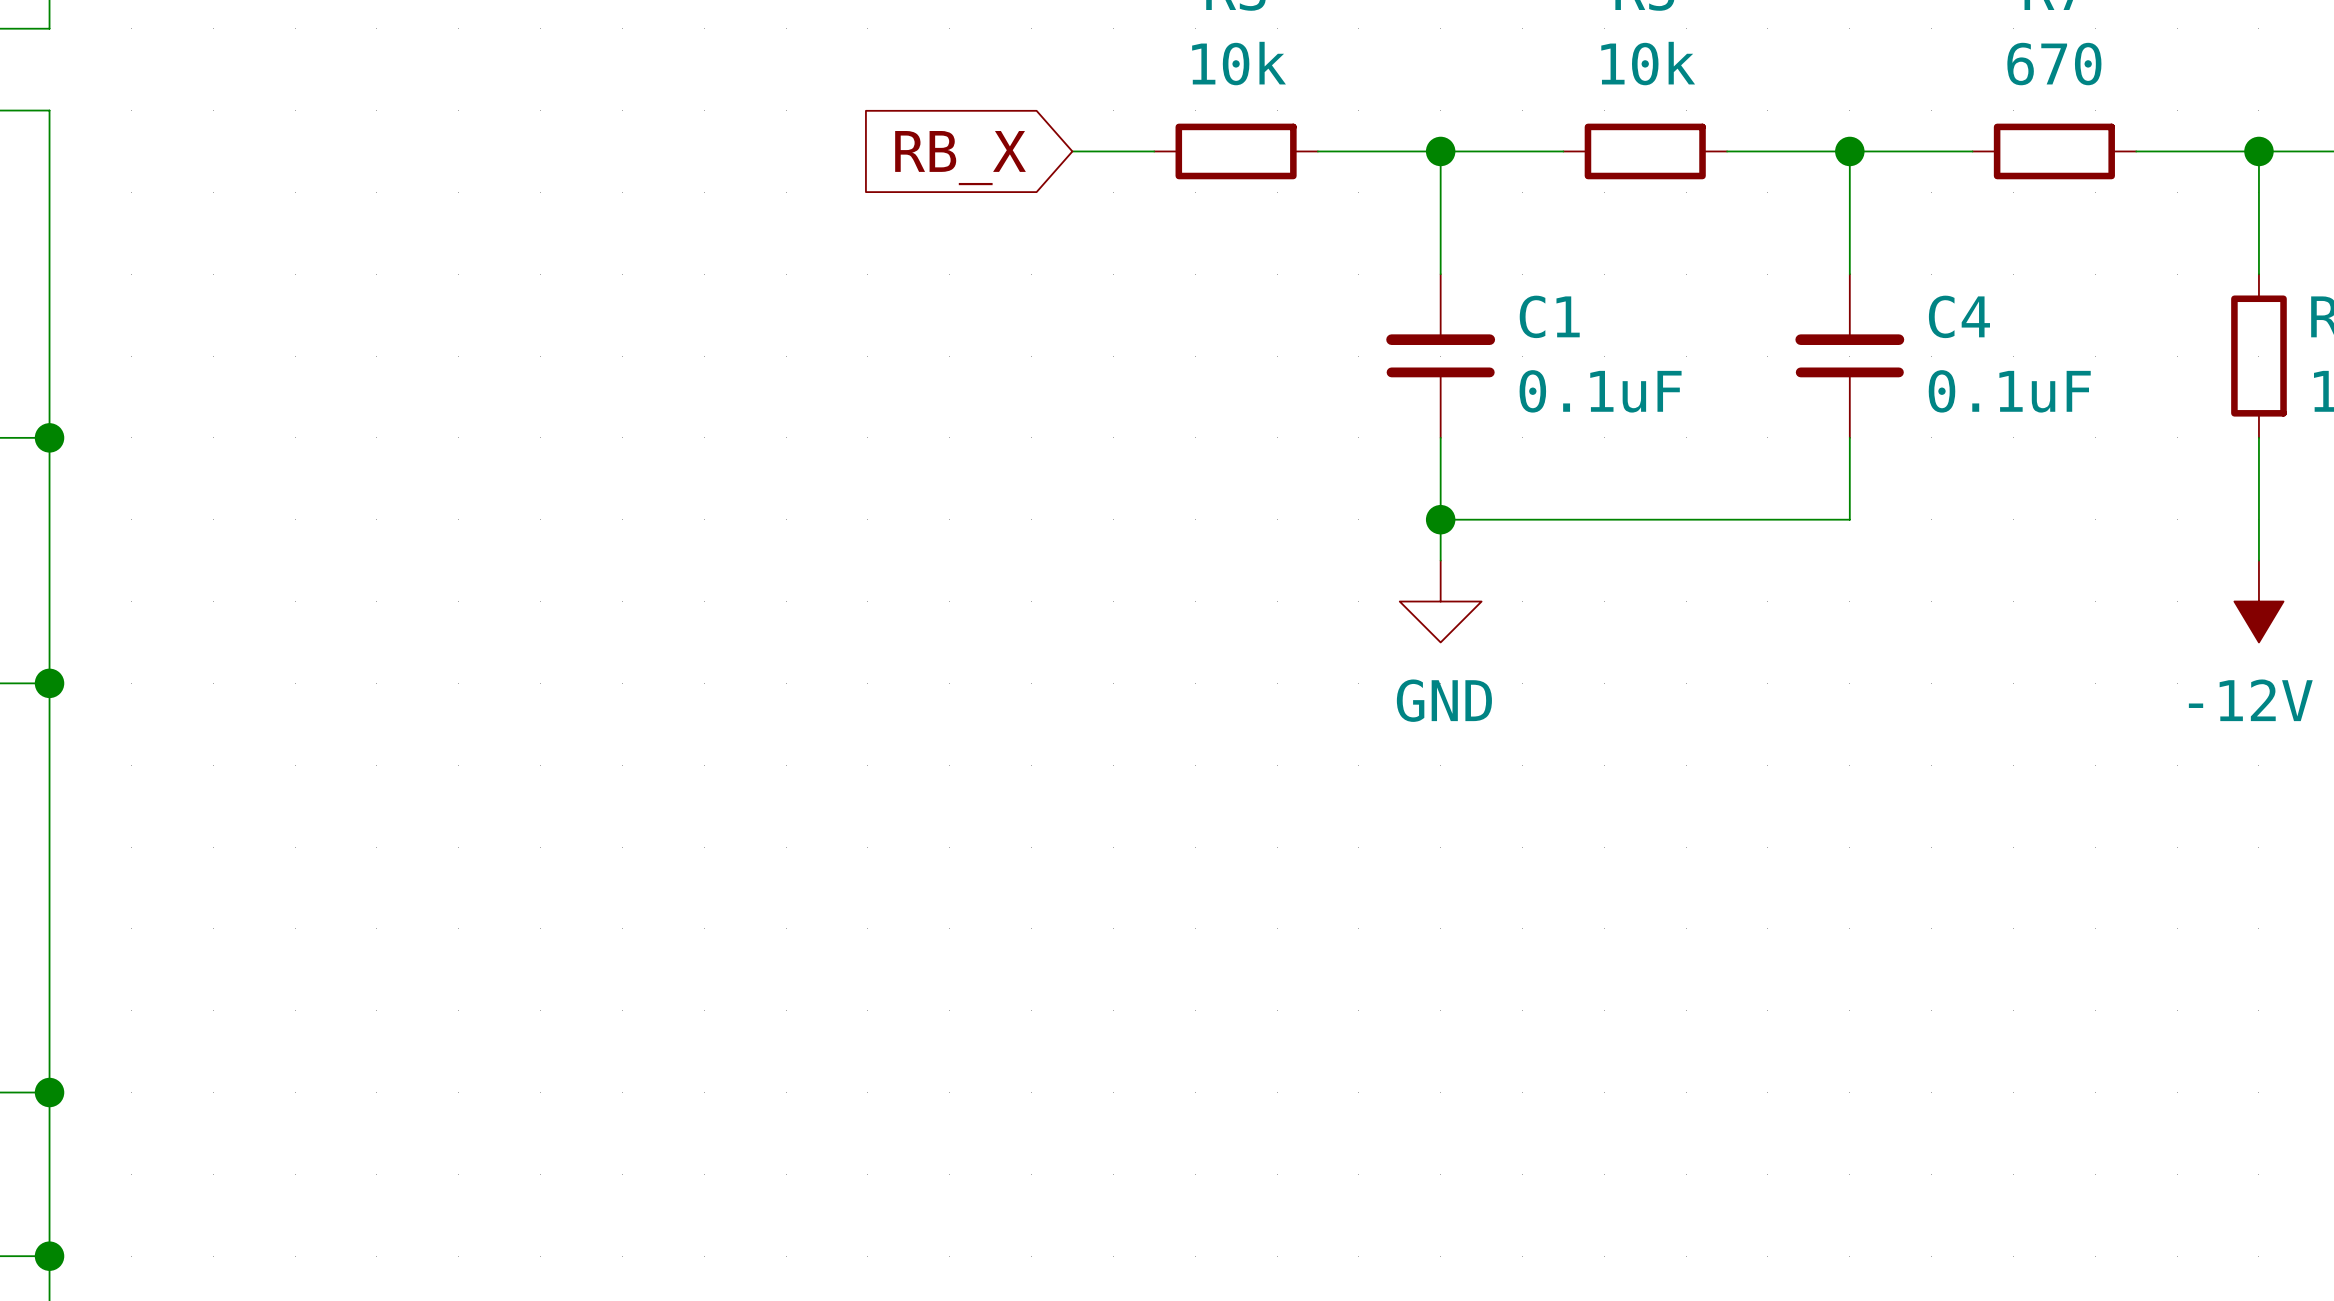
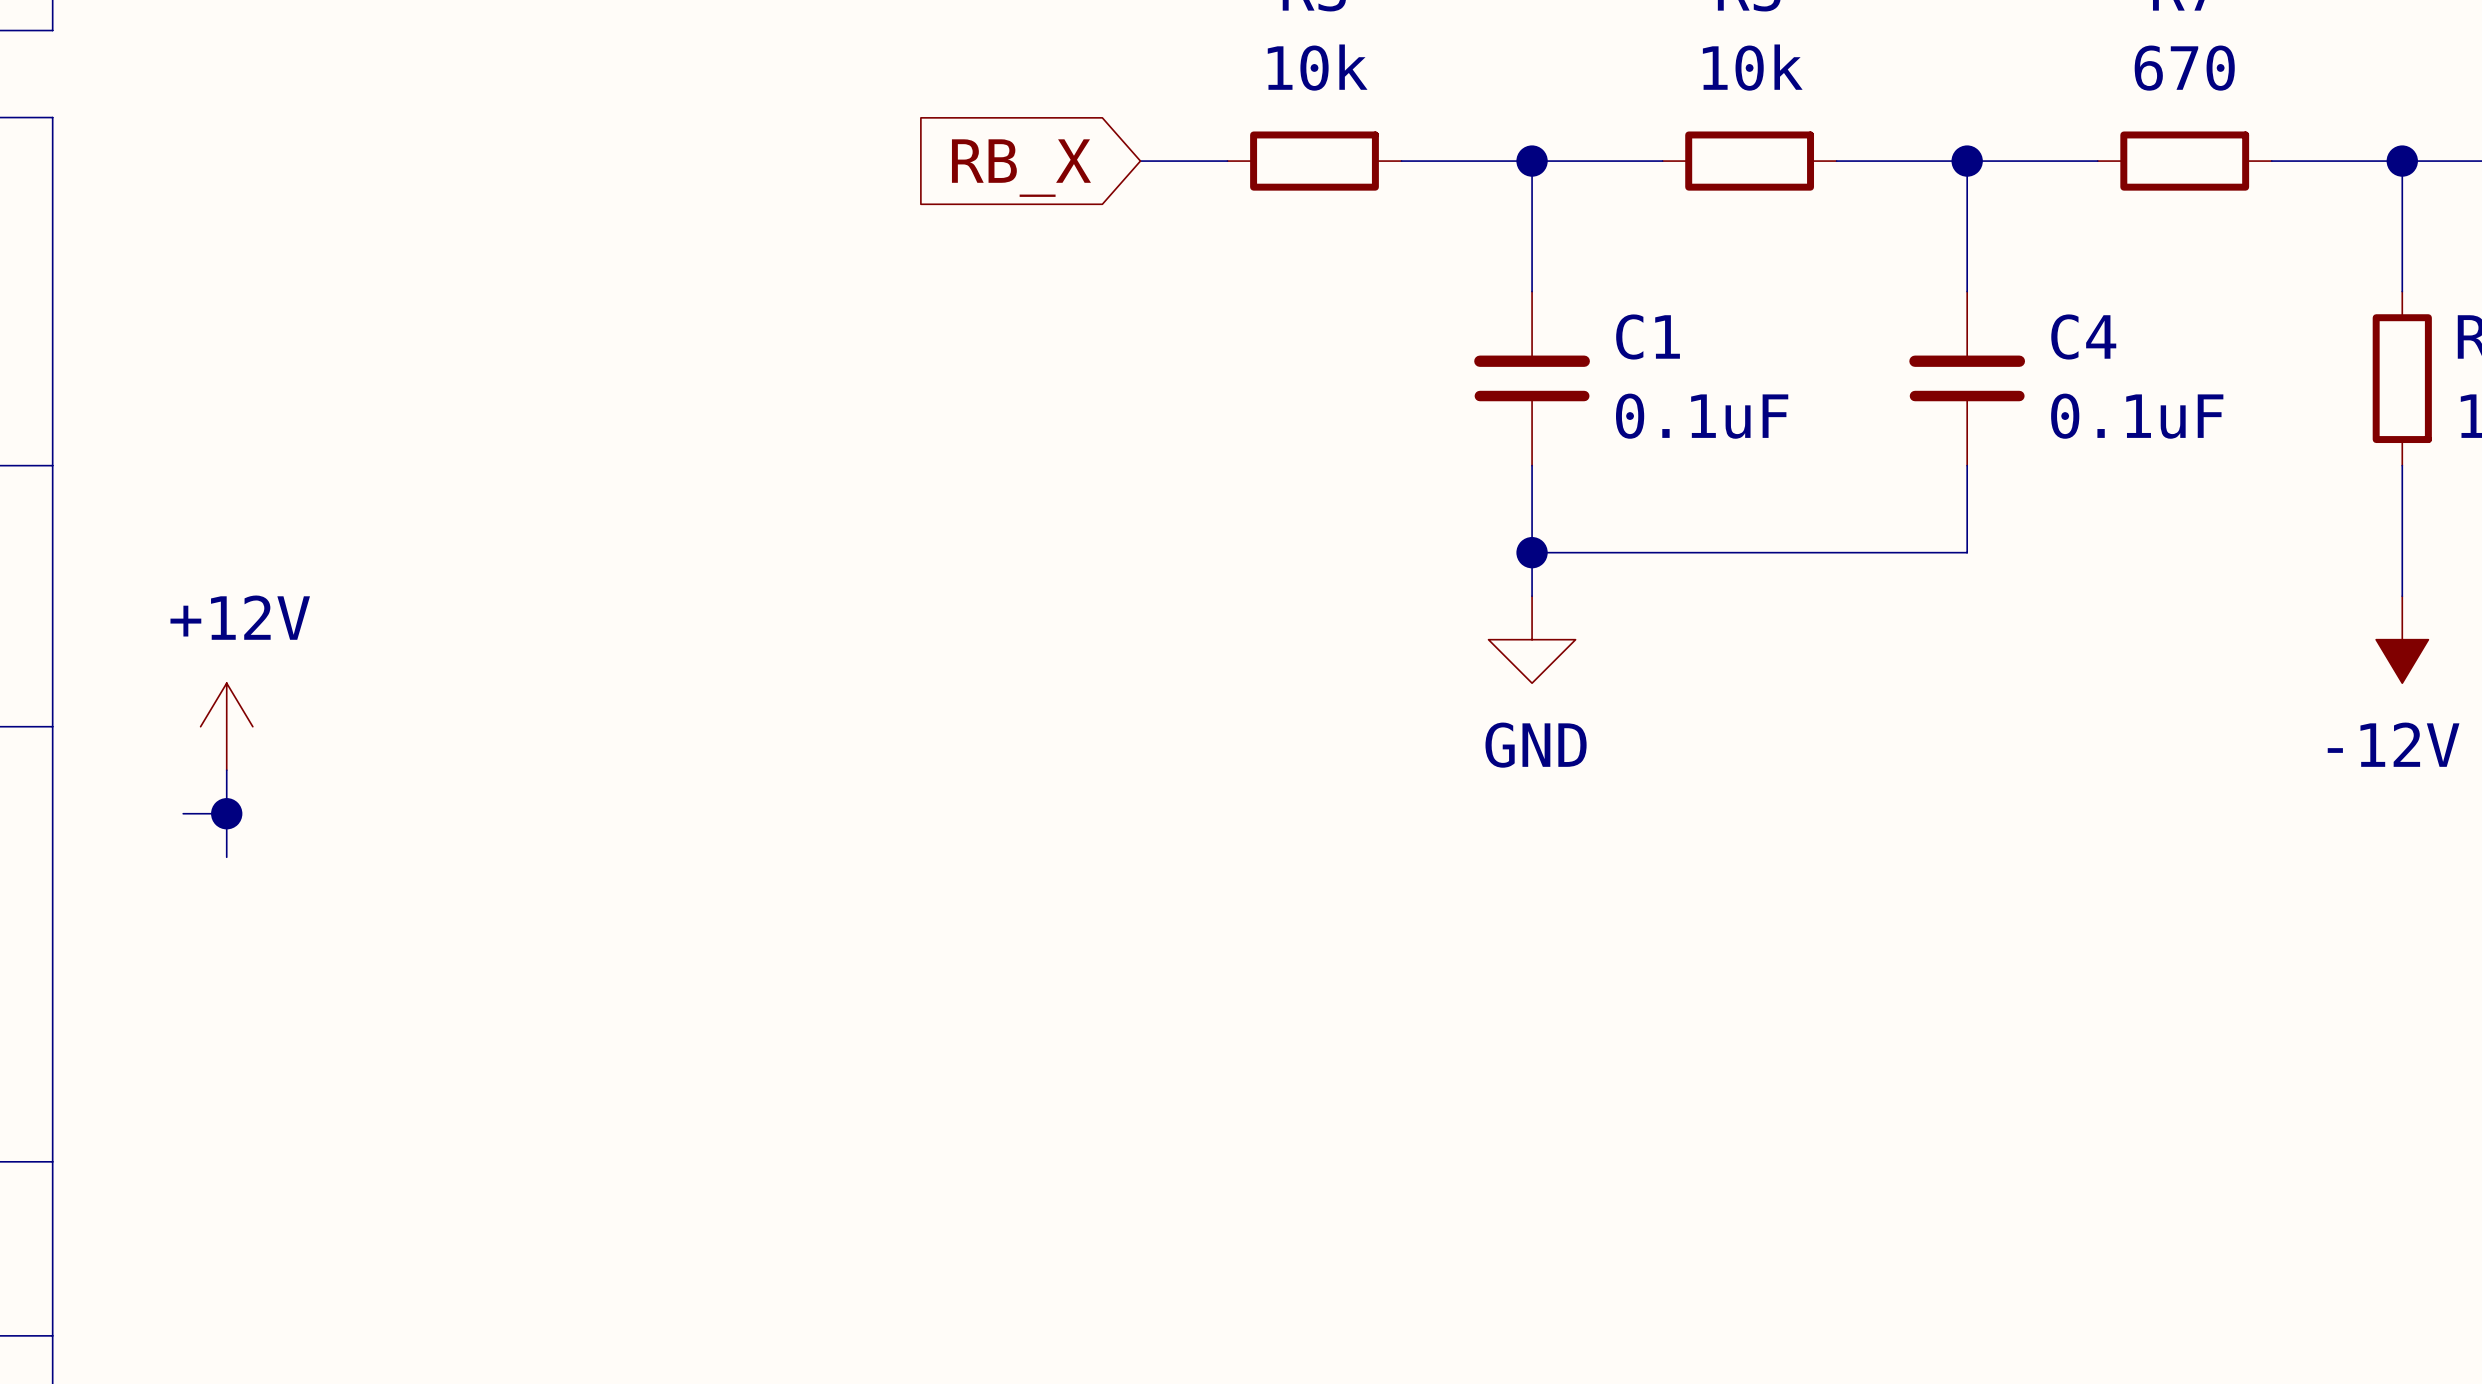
junction: (49, 437) -> none
junction: (49, 683) -> none
power symbol: none -> +12V (226, 726)
wire: none -> (226, 770) (226, 857)
wire: none -> (183, 813) (226, 813)
junction: none -> (226, 813)
junction: (49, 1092) -> none
junction: (49, 1256) -> none

